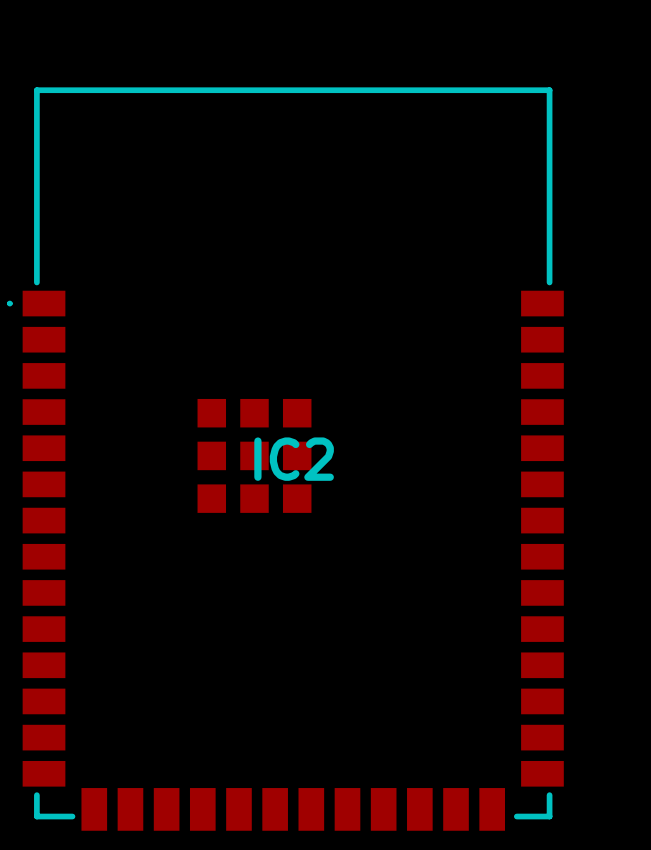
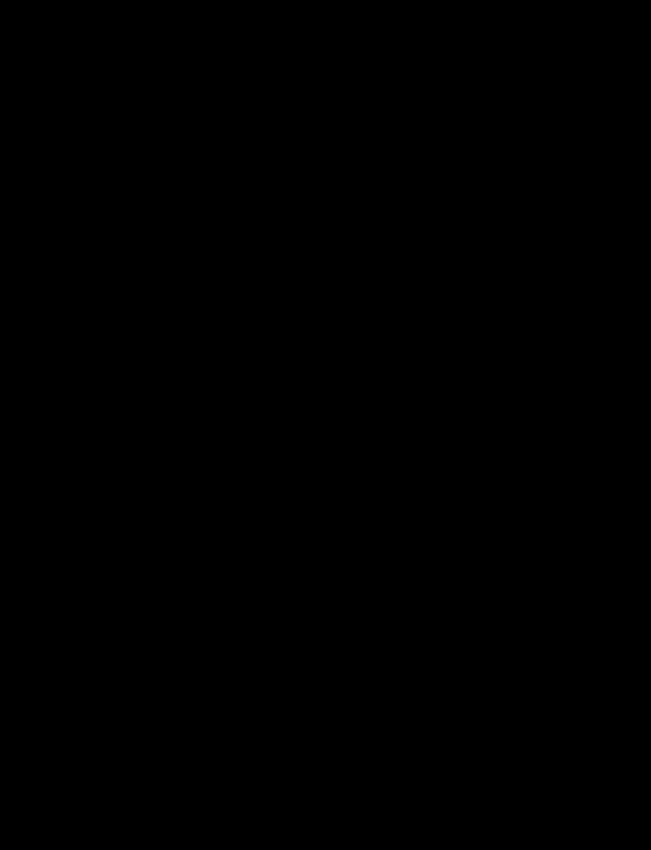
IC2: (285, 459) -> none

